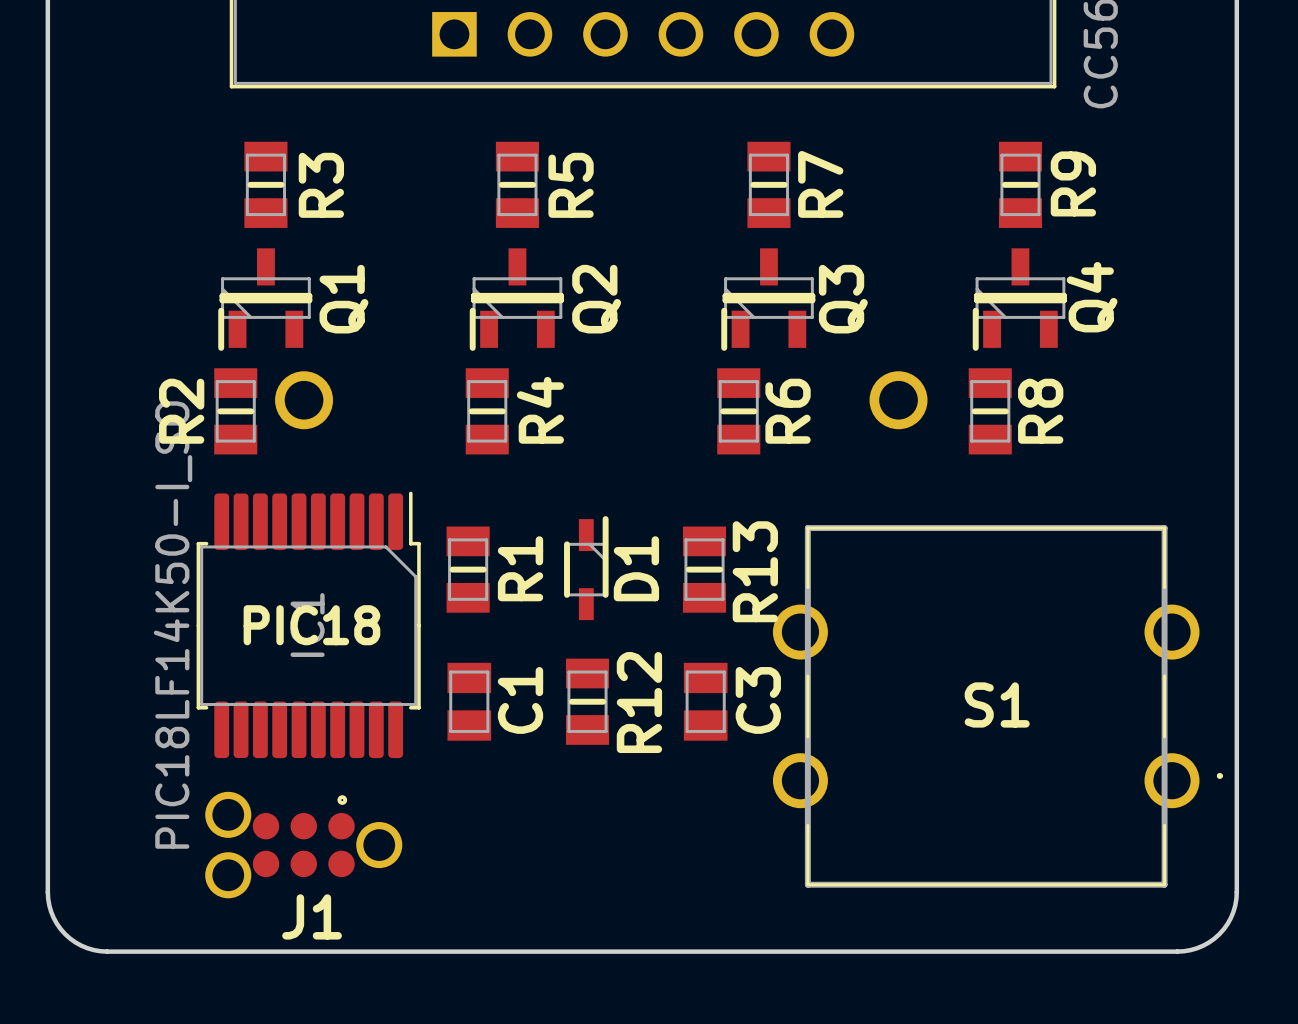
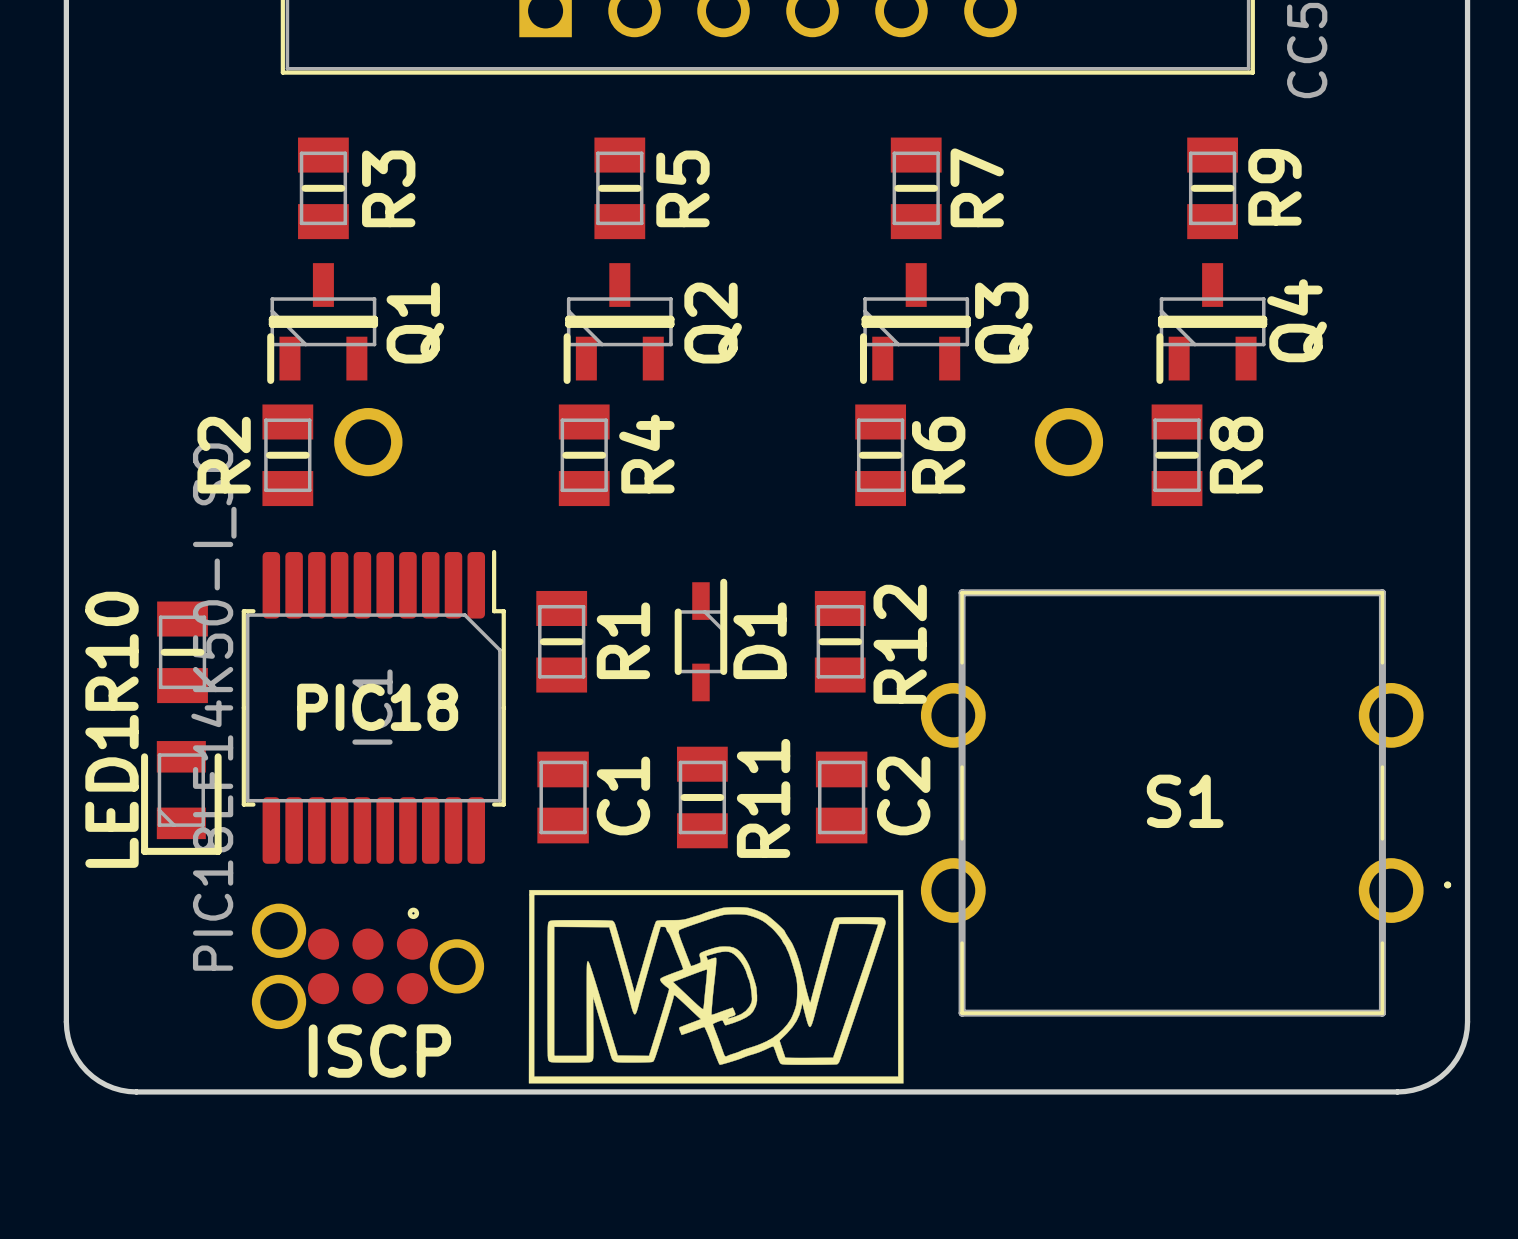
R13 name: R13 (755, 571) -> R12 (900, 644)
R10: none -> (182, 652)
C3 name: C3 (758, 700) -> C2 (903, 795)
LED1: none -> (181, 797)
R12 name: R12 (639, 702) -> R11 (763, 798)
drawing: none -> [528, 889, 904, 1084]
J1 name: J1 (312, 916) -> ISCP (379, 1051)

